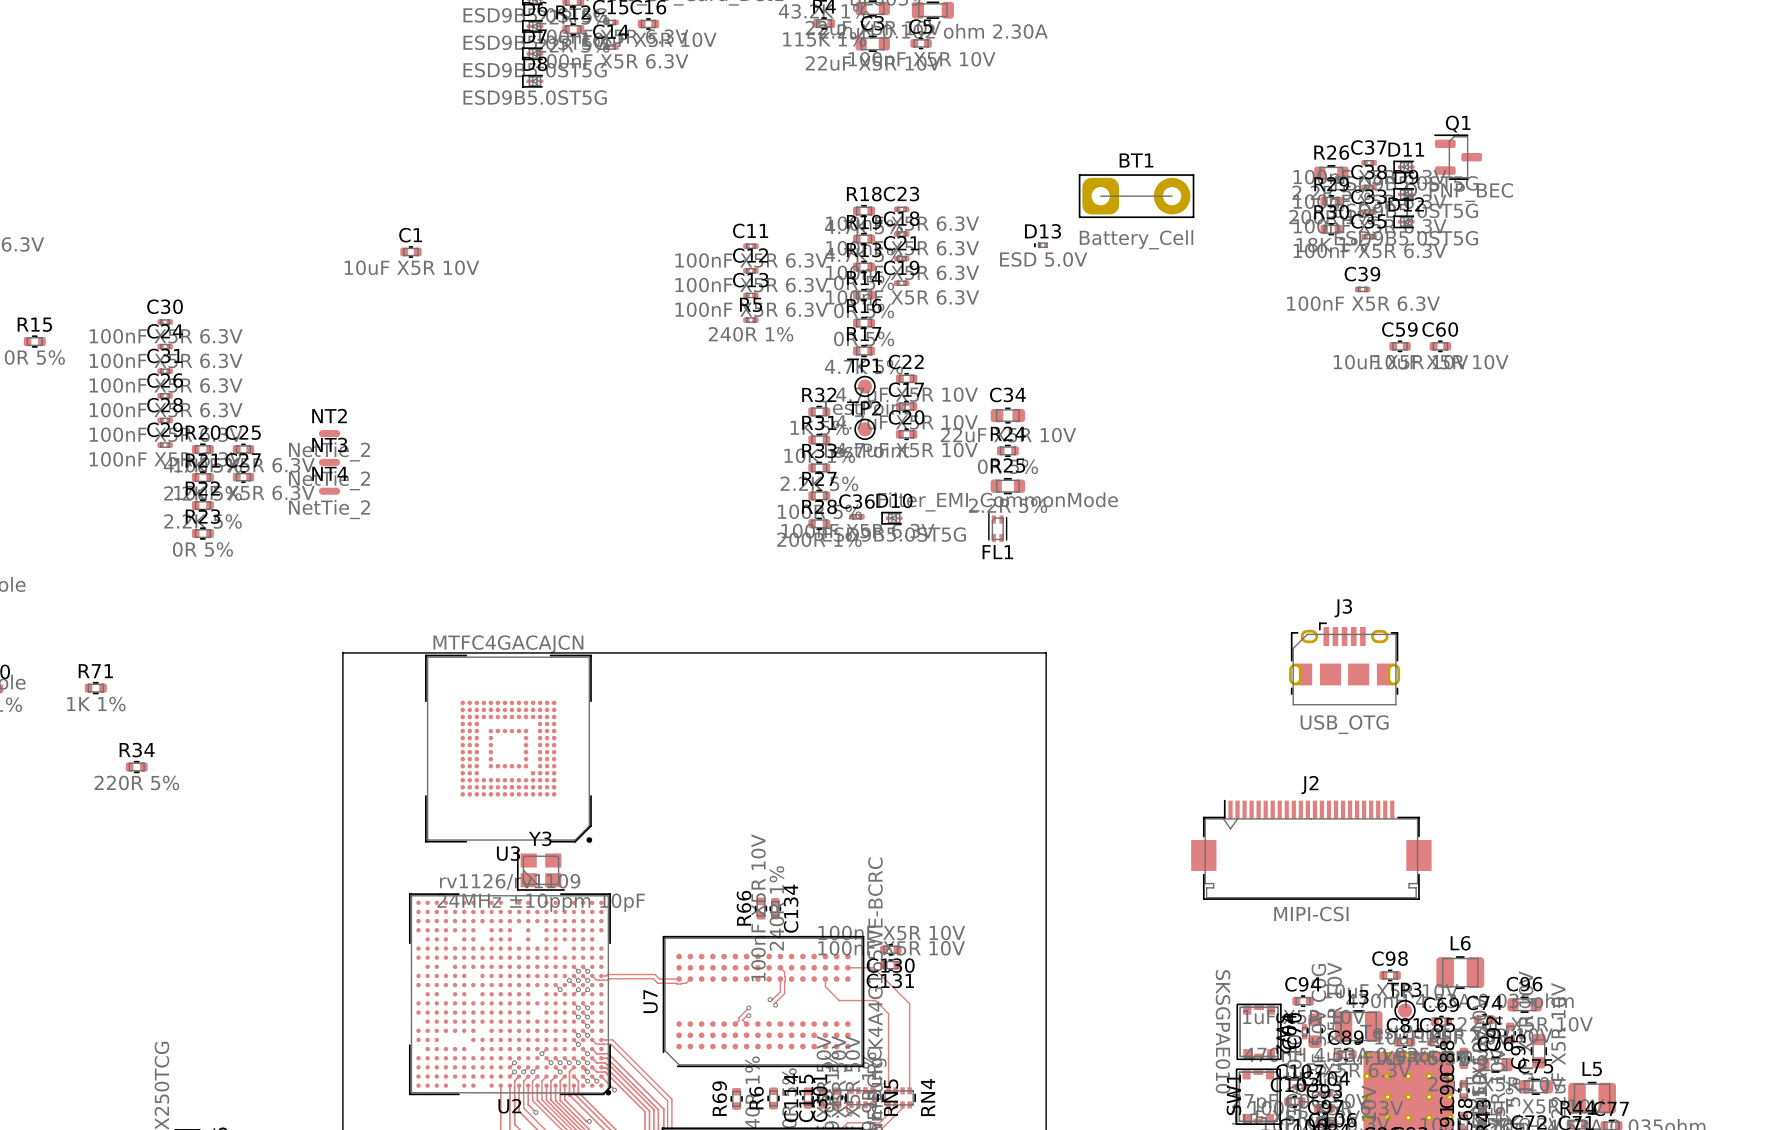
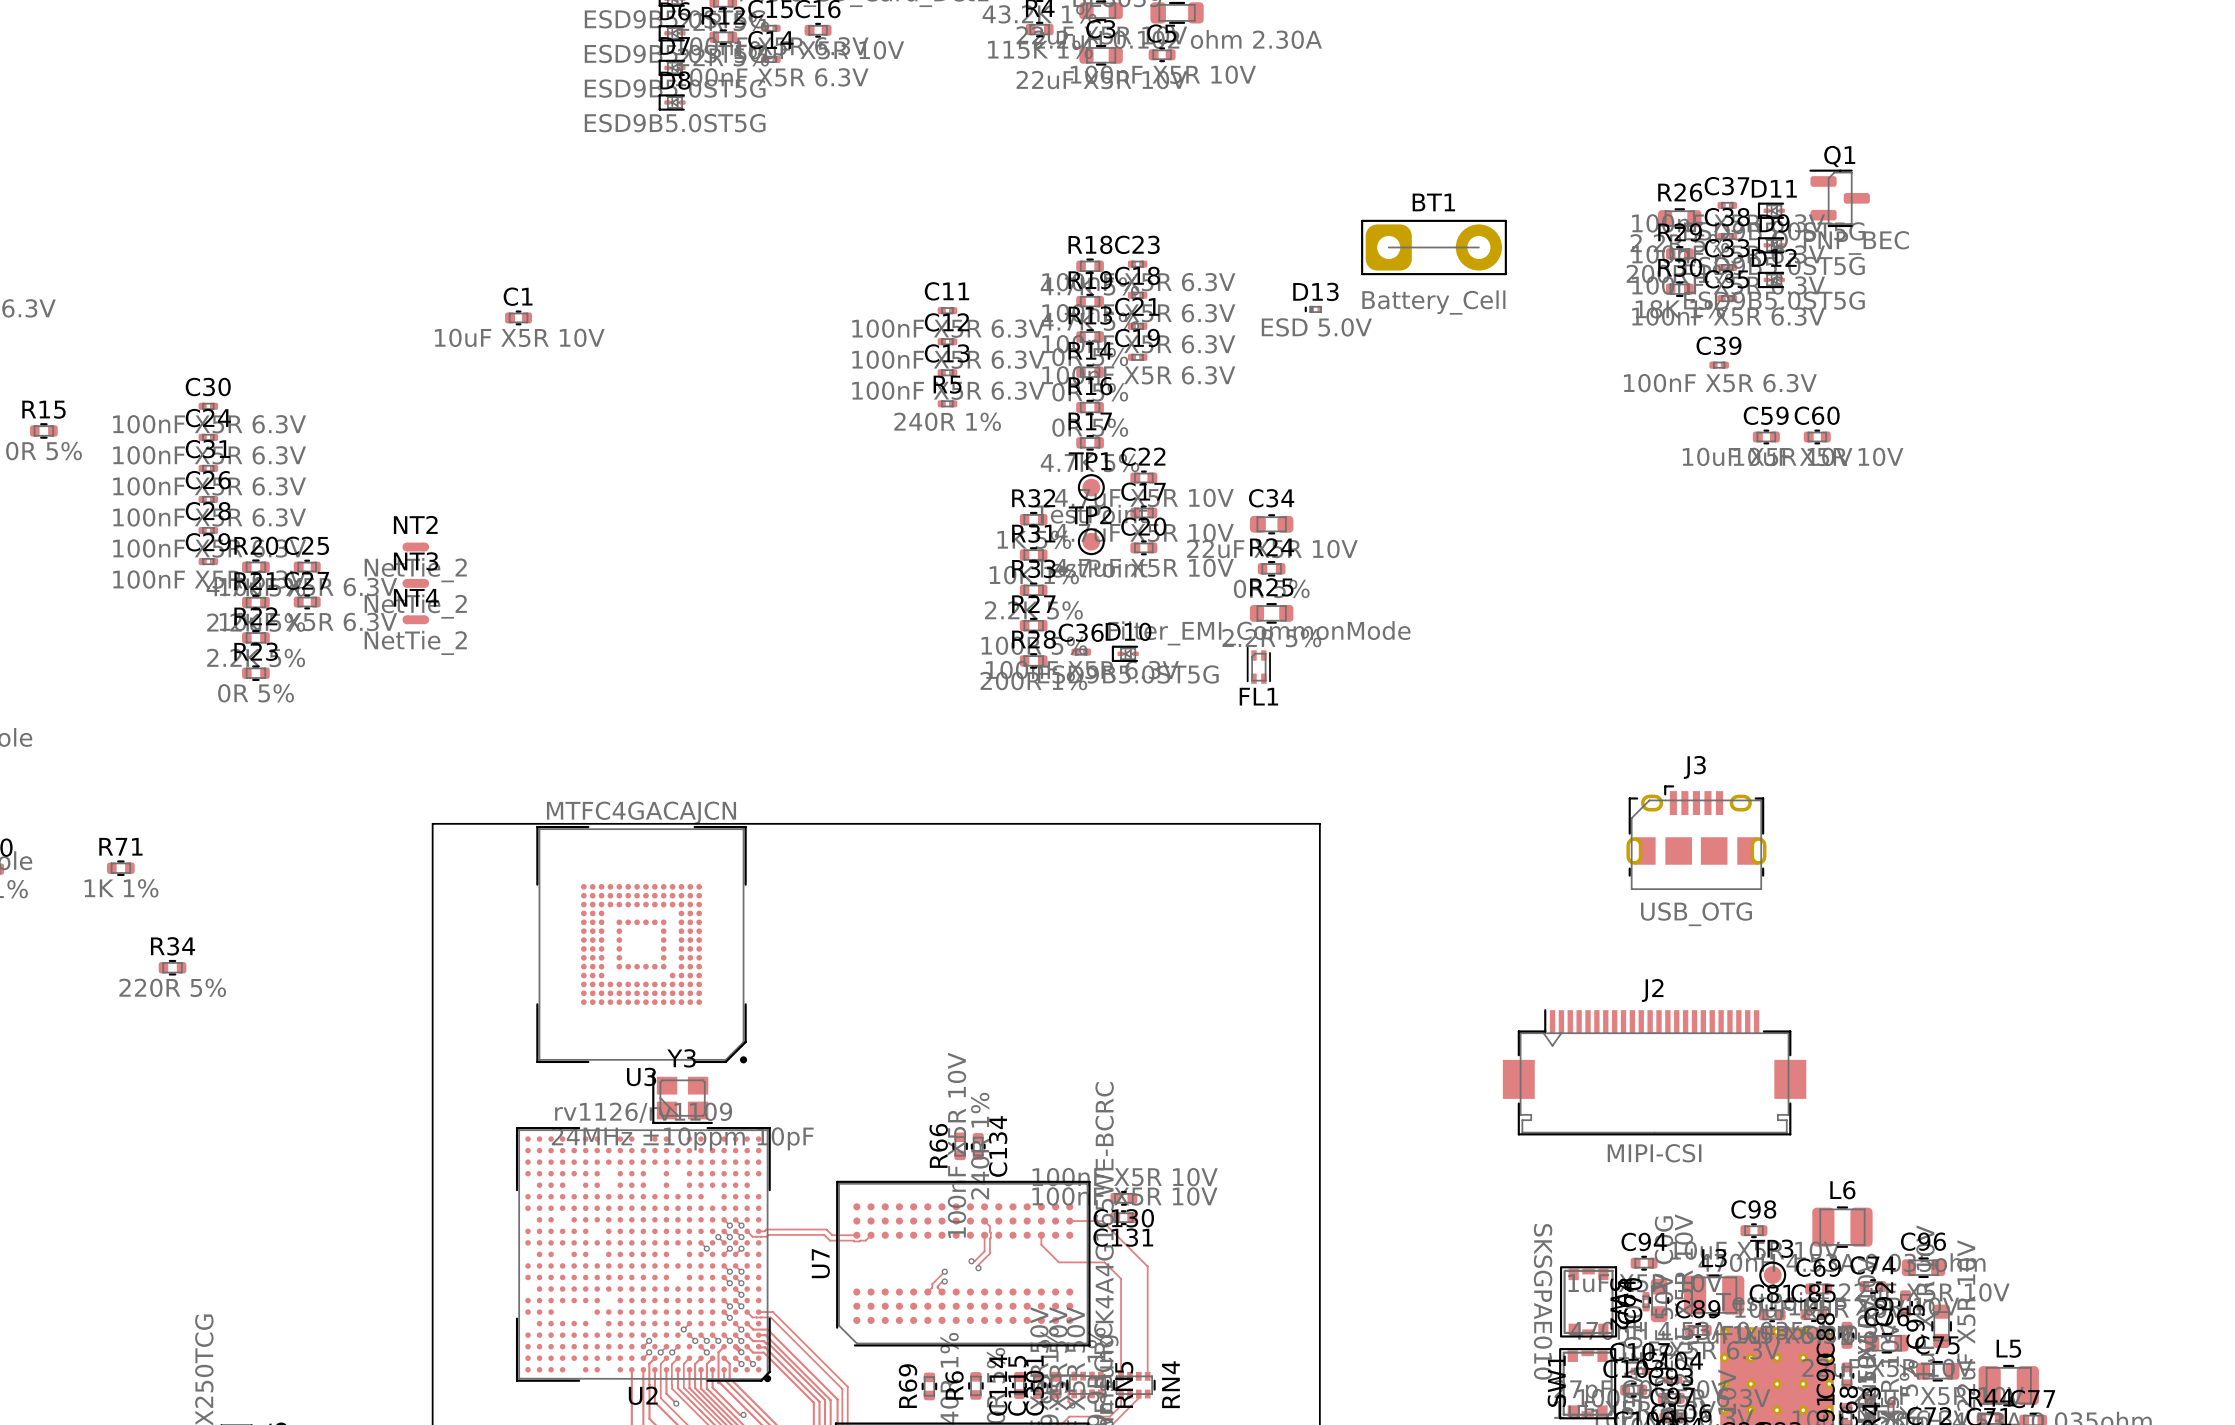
track: (601, 1076) (614, 1090) -> none
via: (614, 1090) -> none

